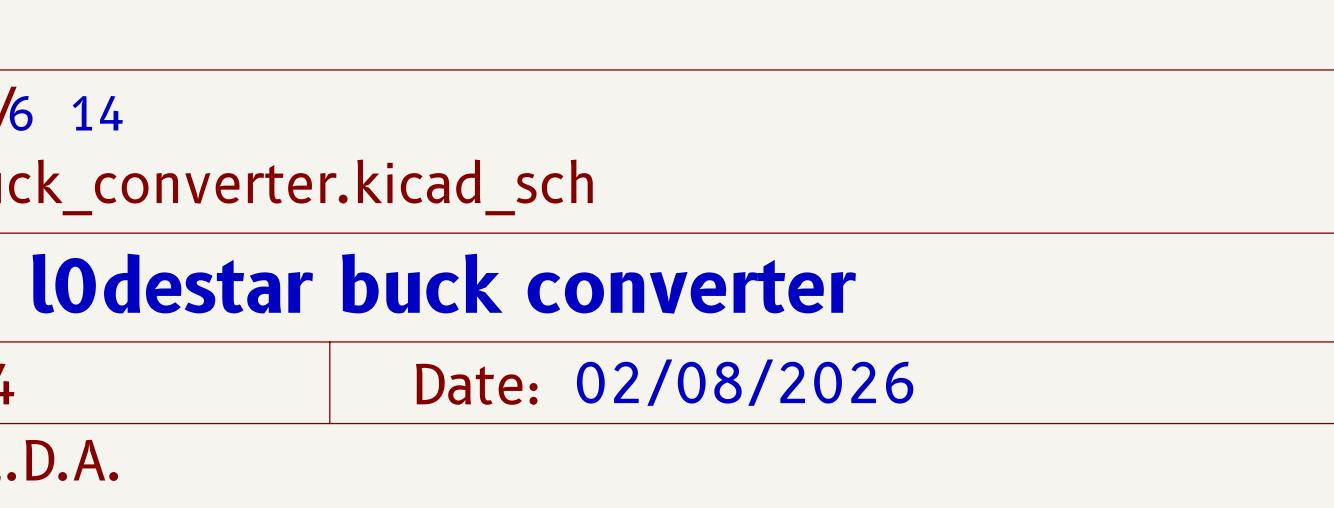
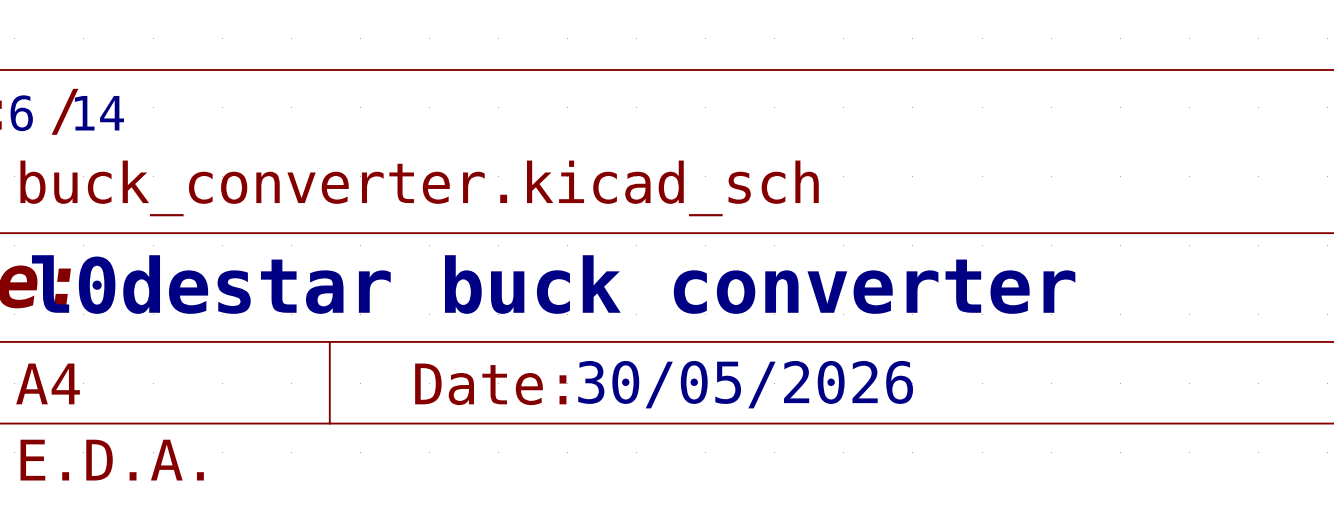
text: 02/08/2026 (745, 382) -> 30/05/2026 (745, 384)

